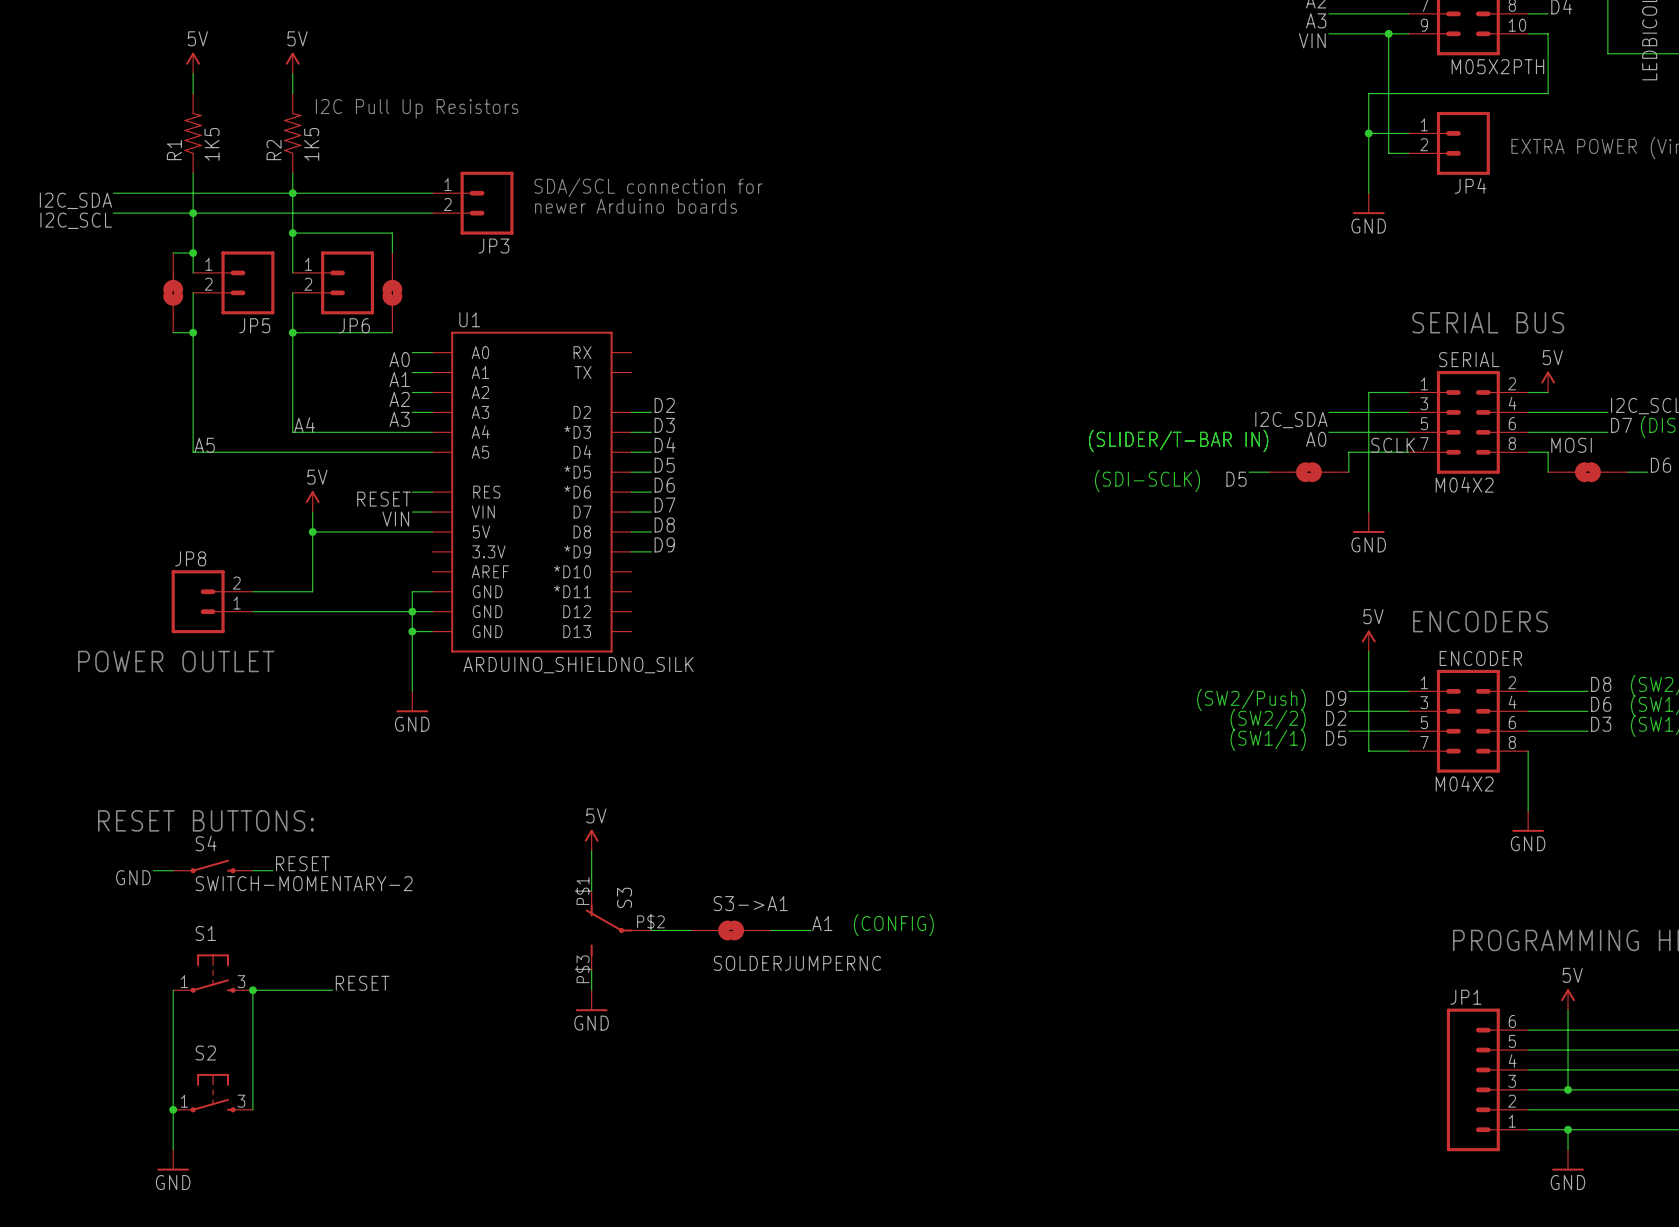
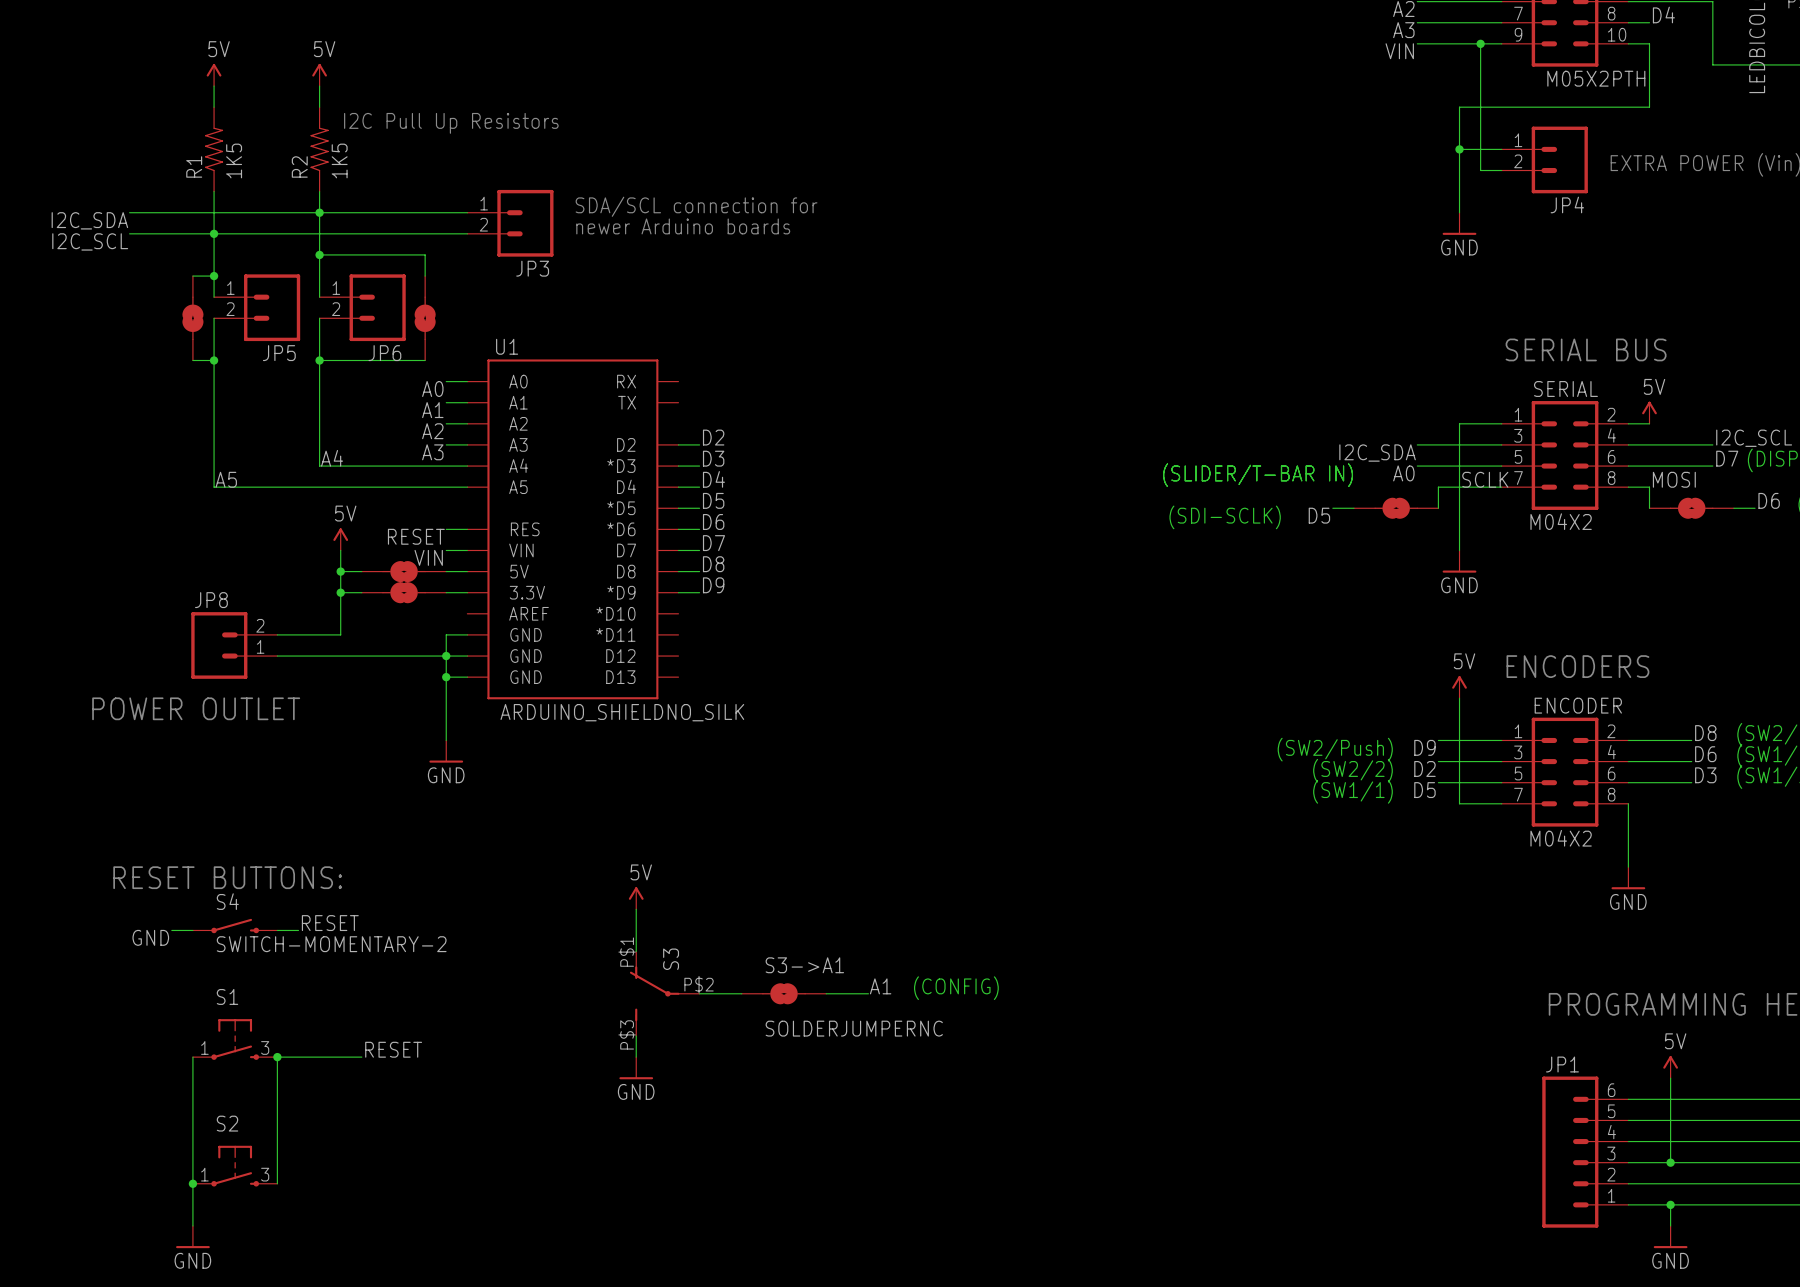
part: none -> (404, 571)
wire: none -> (340, 592) (361, 592)
junction: none -> (340, 592)
part: none -> (404, 592)
wire: none -> (446, 592) (467, 592)

